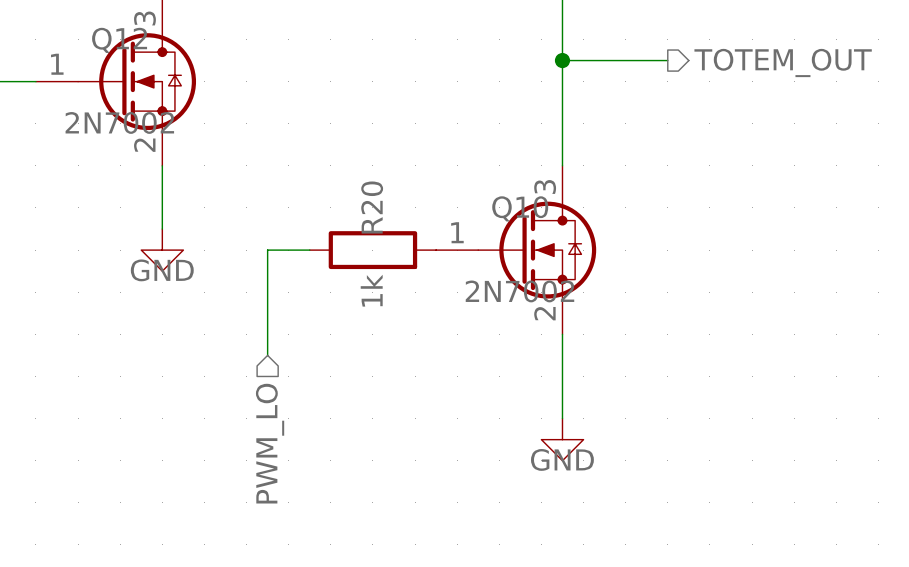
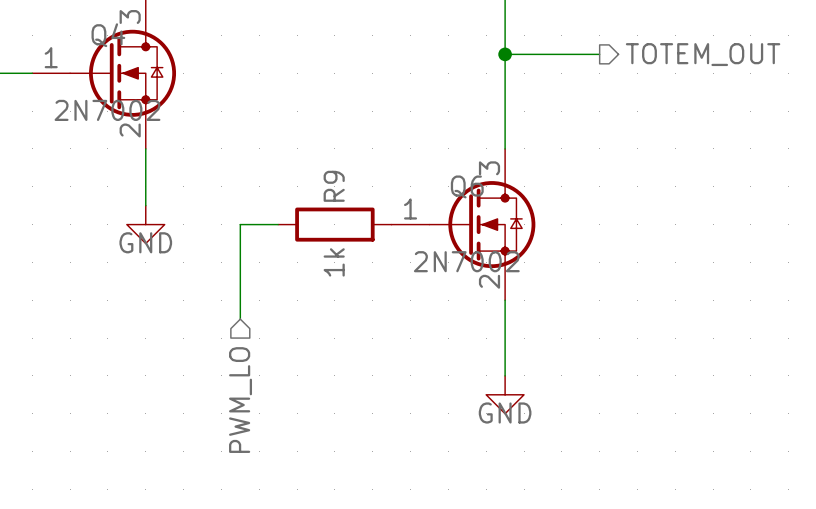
Q12 name: Q12 (119, 40) -> Q4 (108, 35)
R20 name: R20 (372, 207) -> R9 (334, 186)
Q10 name: Q10 (520, 208) -> Q6 (467, 186)

